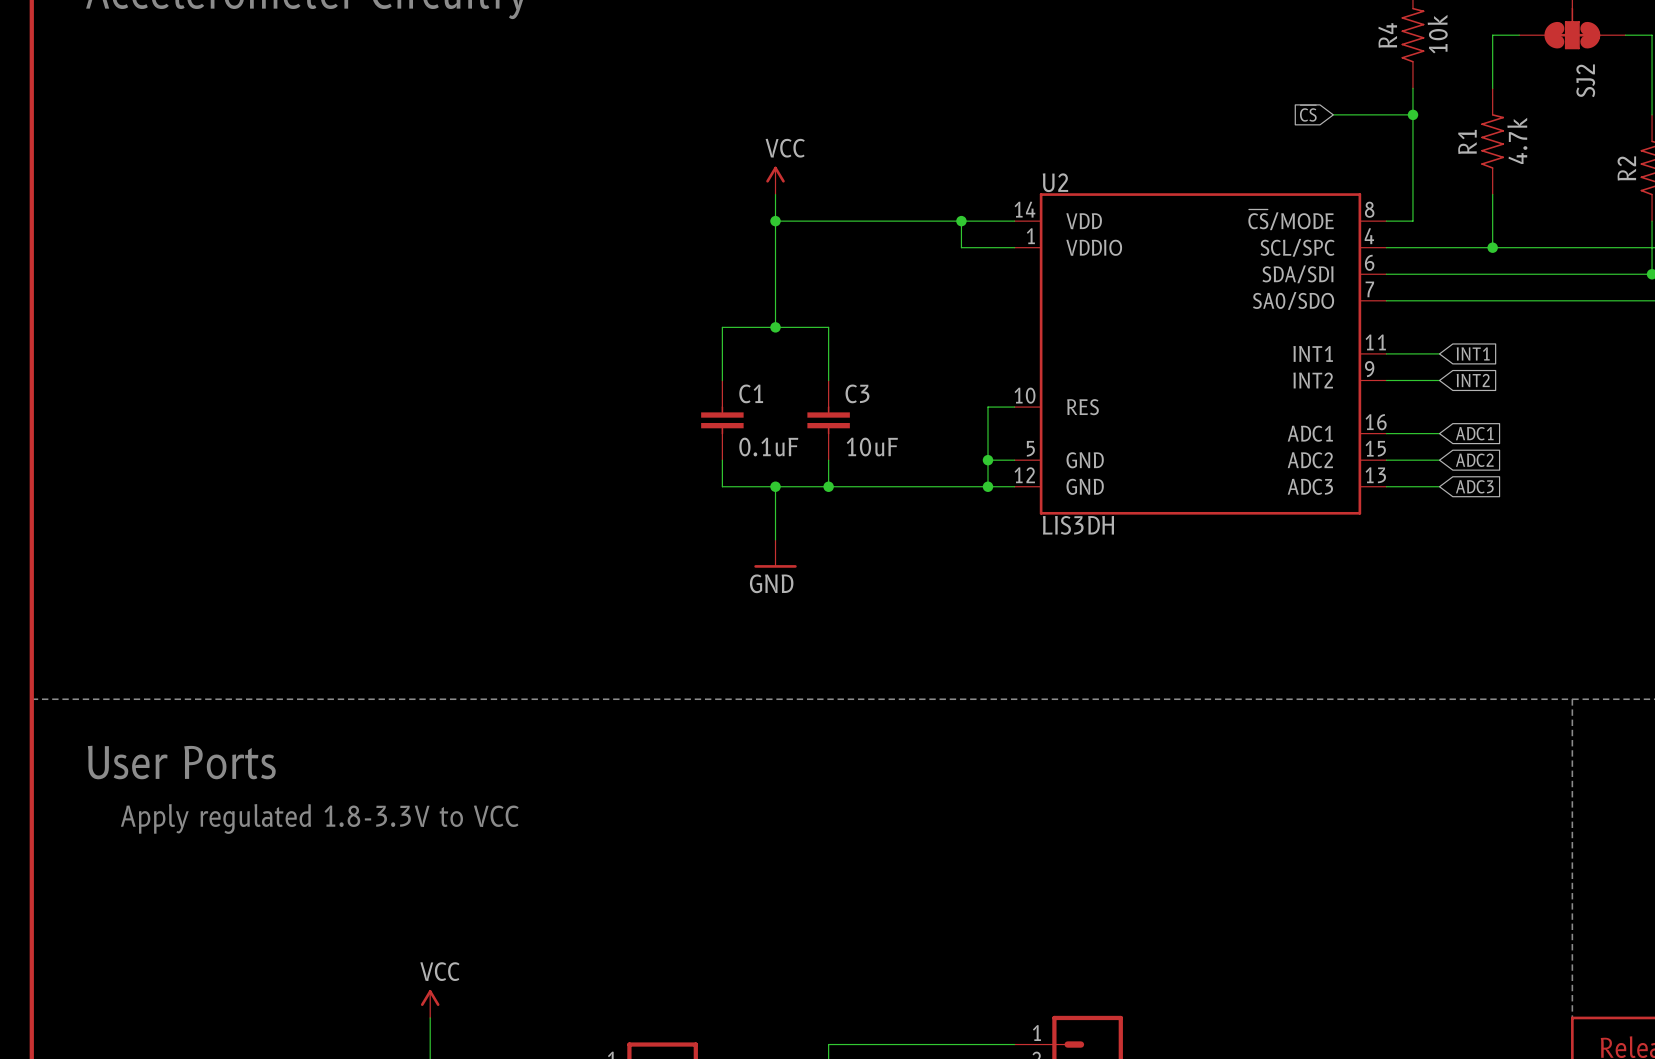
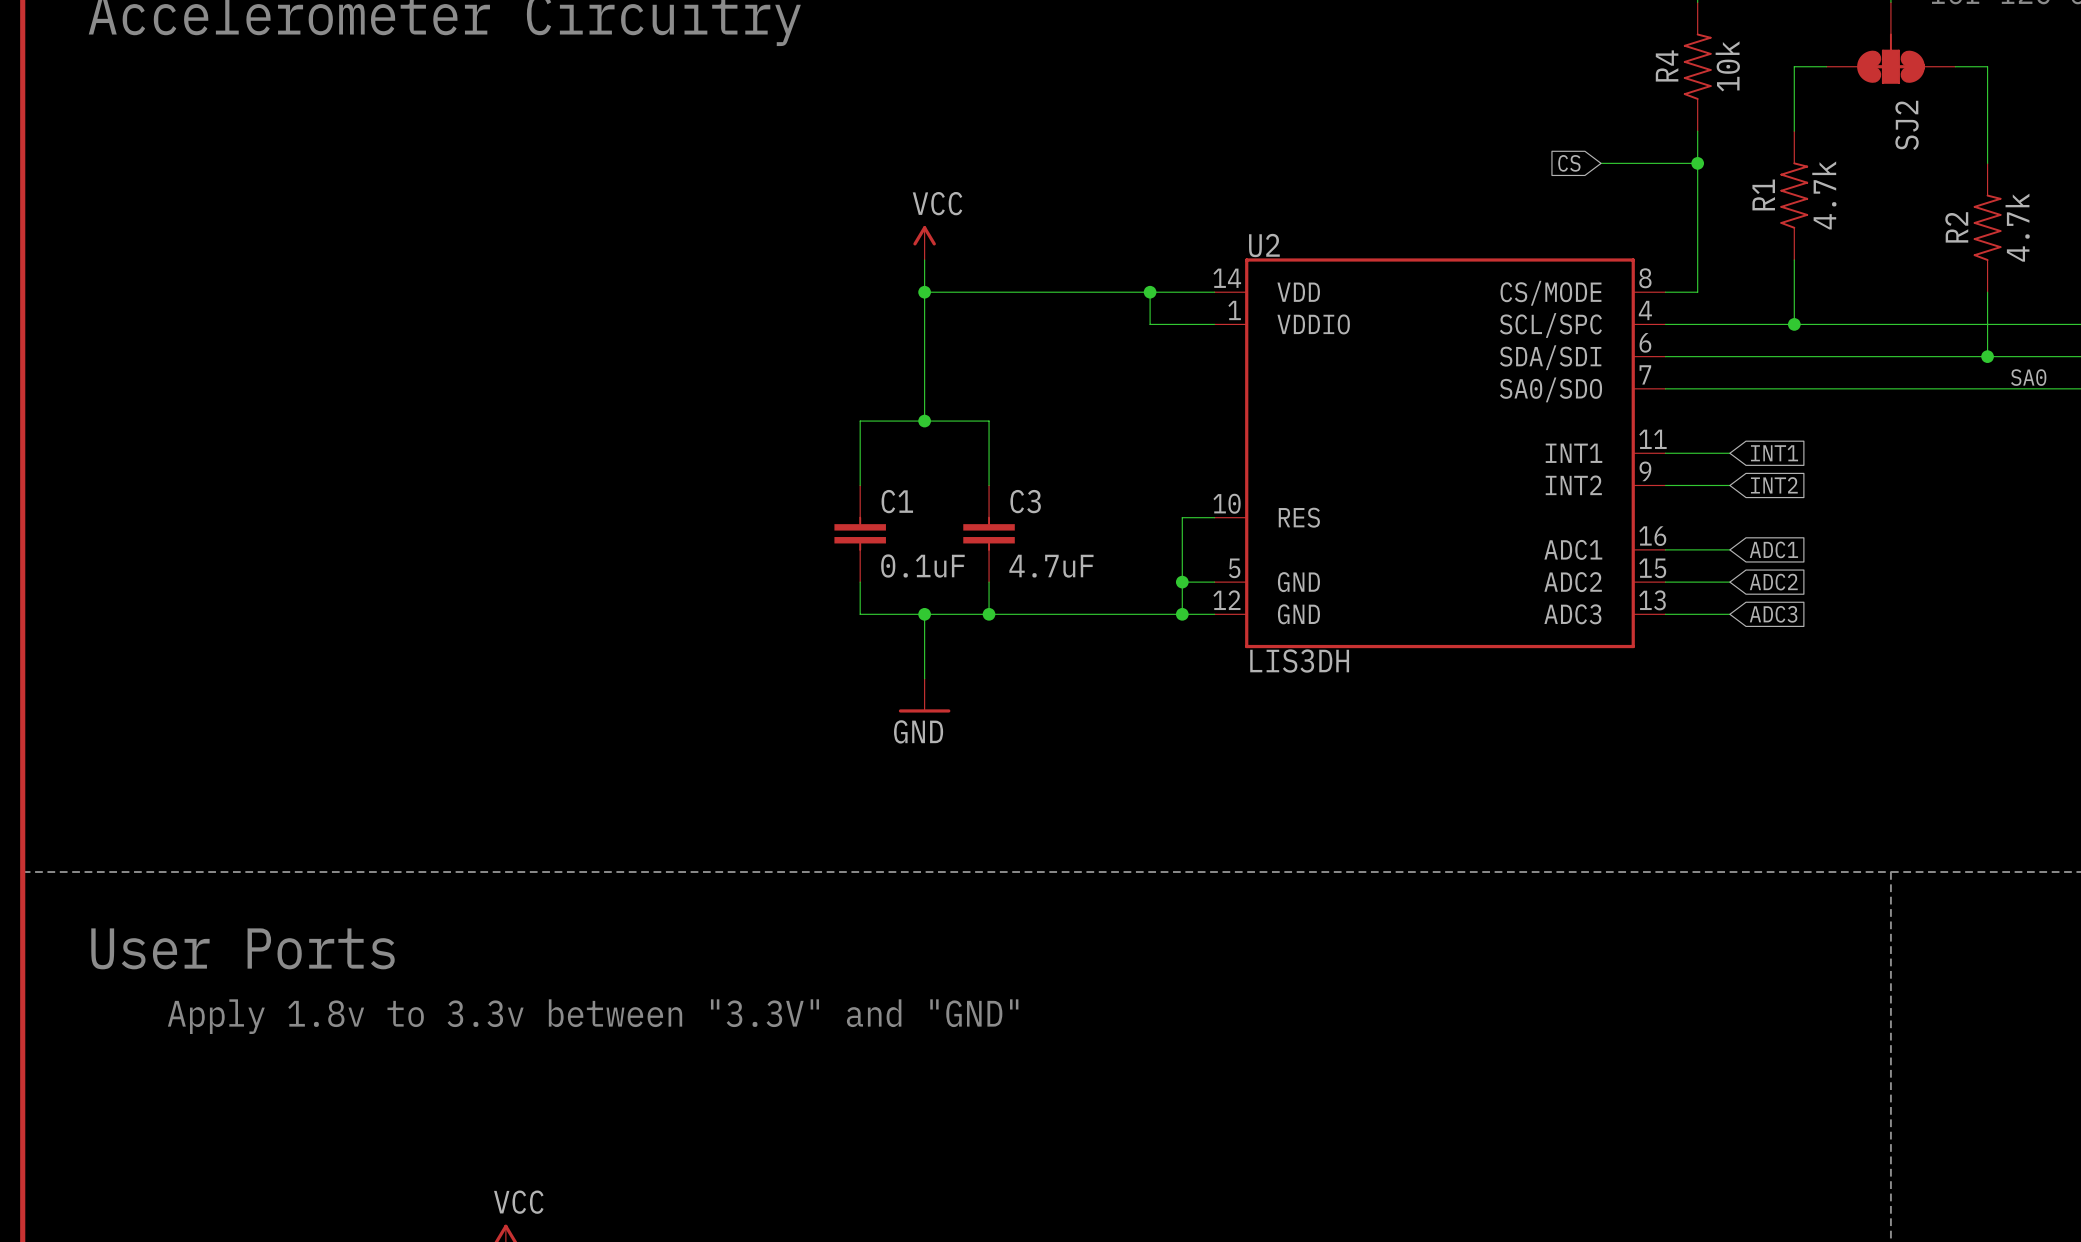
global label: ~{CS} (1308, 113) -> CS (1569, 163)
U2 pin name: ~{CS}/MODE (1291, 219) -> CS/MODE (1550, 293)
C3 value: 10uF (872, 447) -> 4.7uF (1051, 566)
text: Apply regulated 1.8-3.3V to VCC (319, 819) -> Apply 1.8v to 3.3v between "3.3V" and "GND" (593, 1016)

